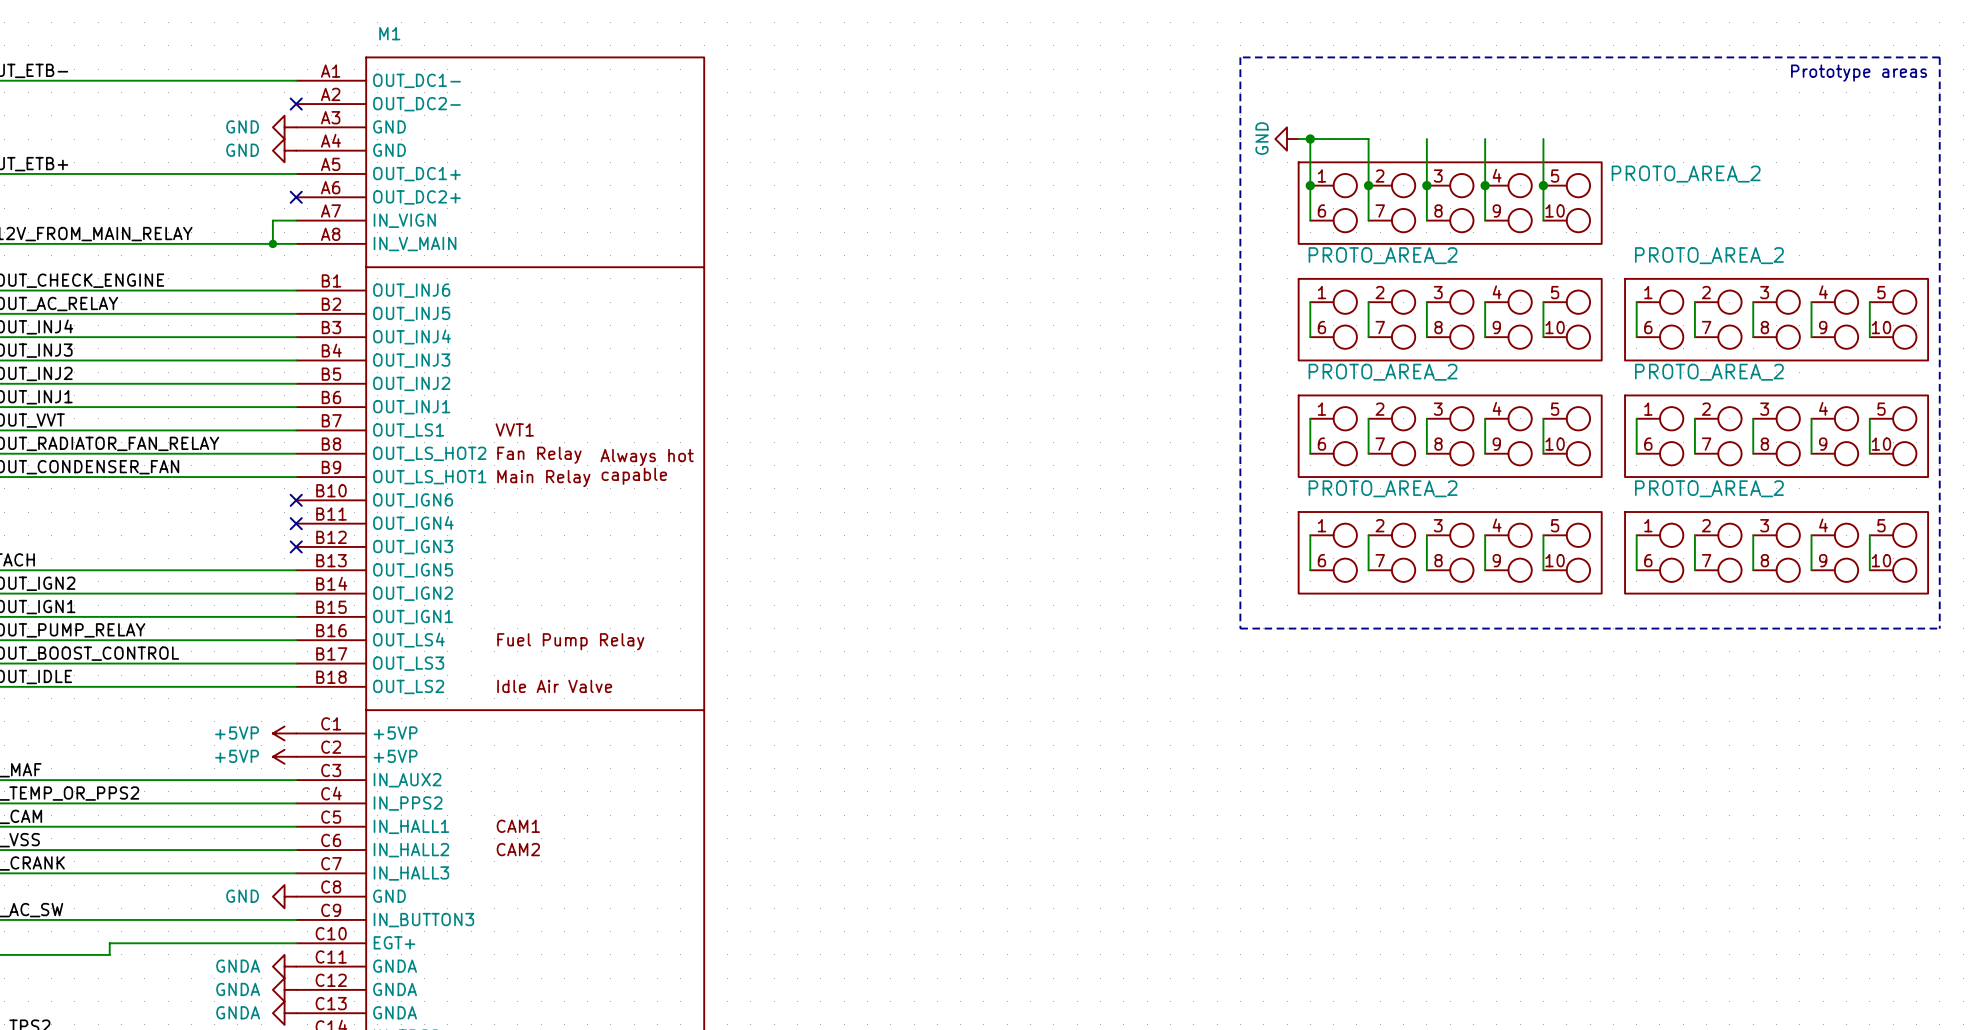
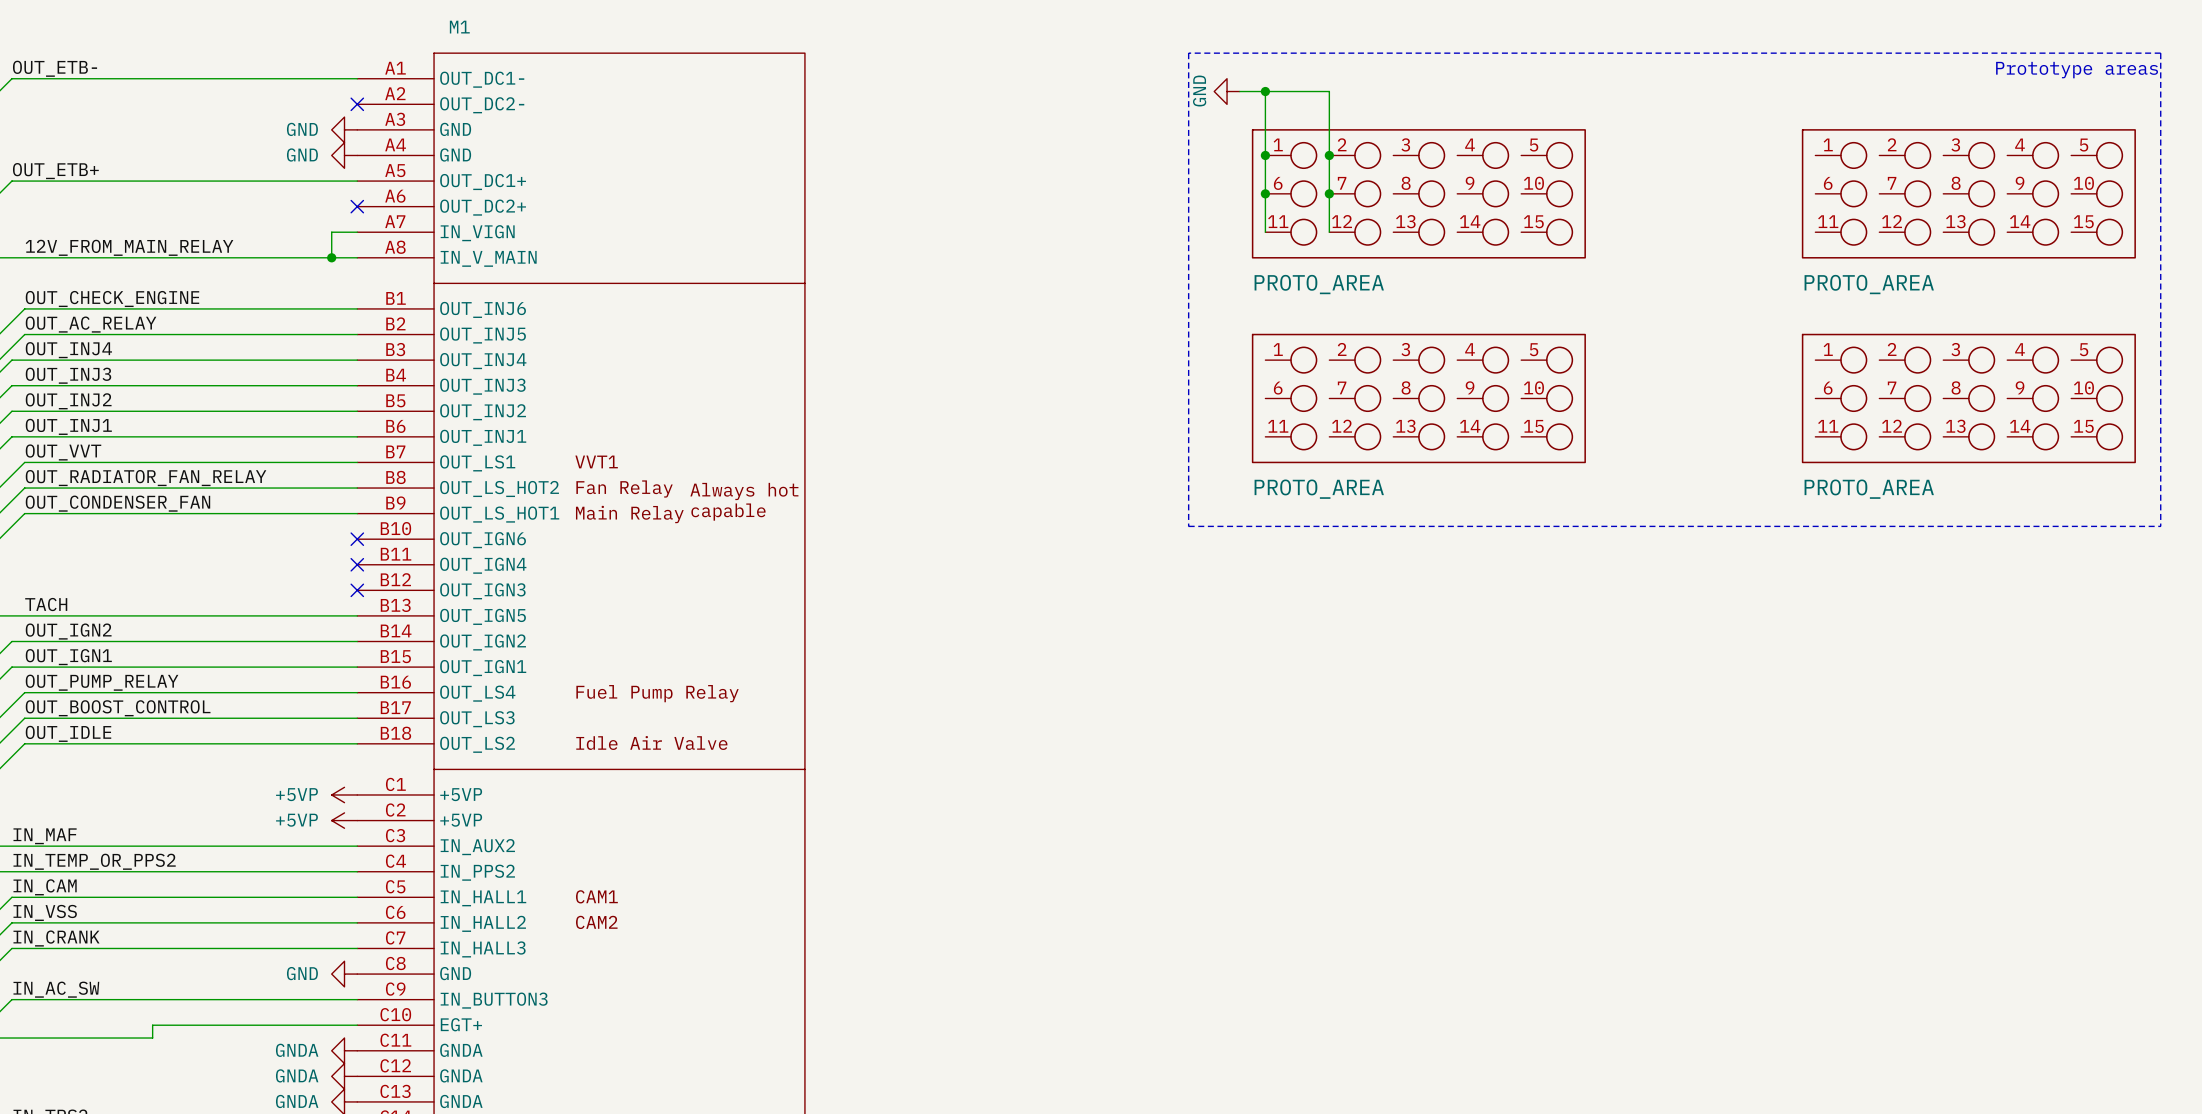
line: (1240, 57) (1240, 628) (1939, 628) (1939, 488) -> (1393, 53) (1188, 53) (1188, 526) (2160, 526)
wire: none -> (1239, 91) (1329, 91) (1329, 232)
wire: none -> (1265, 91) (1265, 232)
junction: none -> (1265, 91)
power symbol position: GND (1287, 139) -> GND (1227, 91)
wire: (1298, 139) (1368, 139) (1368, 220) -> none
wire: (1310, 139) (1310, 220) -> none
junction: (1310, 139) -> none
wire: (1426, 139) (1426, 220) -> none
wire: (1485, 139) (1485, 220) -> none
wire: (1543, 139) (1543, 220) -> none
junction: none -> (1265, 155)
junction: none -> (1329, 155)
junction: none -> (1265, 193)
junction: none -> (1329, 193)
part: none -> PROTO_AREA (1418, 193)
junction: (1310, 185) -> none
junction: (1368, 185) -> none
junction: (1426, 185) -> none
junction: (1485, 185) -> none
junction: (1543, 185) -> none
part: none -> PROTO_AREA (1968, 193)
part: PROTO_AREA_2 (1450, 203) -> none
wire: (1310, 302) (1310, 337) -> none
wire: (1368, 302) (1368, 337) -> none
wire: (1426, 302) (1426, 337) -> none
wire: (1485, 302) (1485, 337) -> none
wire: (1543, 302) (1543, 337) -> none
wire: (1636, 302) (1636, 337) -> none
wire: (1694, 302) (1694, 337) -> none
wire: (1753, 302) (1753, 337) -> none
wire: (1811, 302) (1811, 337) -> none
wire: (1869, 302) (1869, 337) -> none
part: PROTO_AREA_2 (1450, 319) -> none
part: PROTO_AREA_2 (1776, 319) -> none
part: none -> PROTO_AREA (1418, 398)
part: none -> PROTO_AREA (1968, 398)
wire: (1310, 418) (1310, 453) -> none
wire: (1368, 418) (1368, 453) -> none
wire: (1426, 418) (1426, 453) -> none
wire: (1485, 418) (1485, 453) -> none
wire: (1543, 418) (1543, 453) -> none
wire: (1636, 418) (1636, 453) -> none
wire: (1694, 418) (1694, 453) -> none
wire: (1753, 418) (1753, 453) -> none
wire: (1811, 418) (1811, 453) -> none
wire: (1869, 418) (1869, 453) -> none
part: PROTO_AREA_2 (1450, 436) -> none
part: PROTO_AREA_2 (1776, 436) -> none
wire: (1310, 535) (1310, 570) -> none
wire: (1368, 535) (1368, 570) -> none
wire: (1426, 535) (1426, 570) -> none
wire: (1485, 535) (1485, 570) -> none
wire: (1543, 535) (1543, 570) -> none
wire: (1636, 535) (1636, 570) -> none
wire: (1694, 535) (1694, 570) -> none
wire: (1753, 535) (1753, 570) -> none
wire: (1811, 535) (1811, 570) -> none
wire: (1869, 535) (1869, 570) -> none
part: PROTO_AREA_2 (1450, 552) -> none
part: PROTO_AREA_2 (1776, 552) -> none

